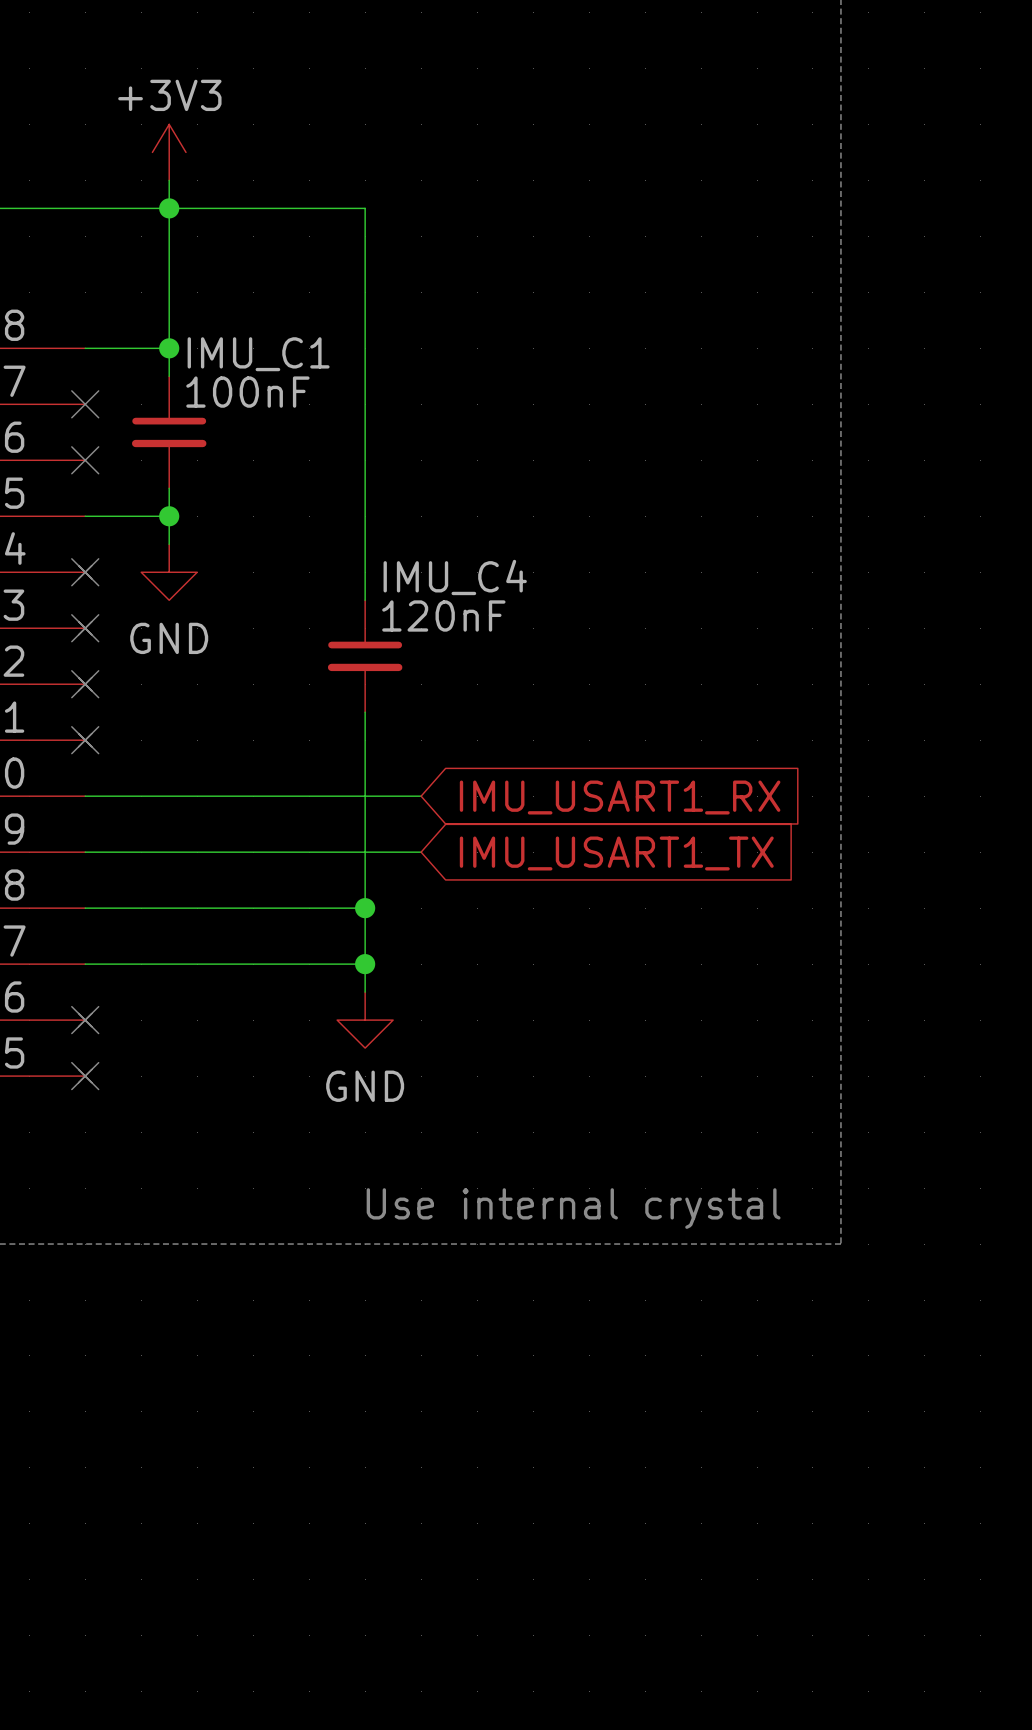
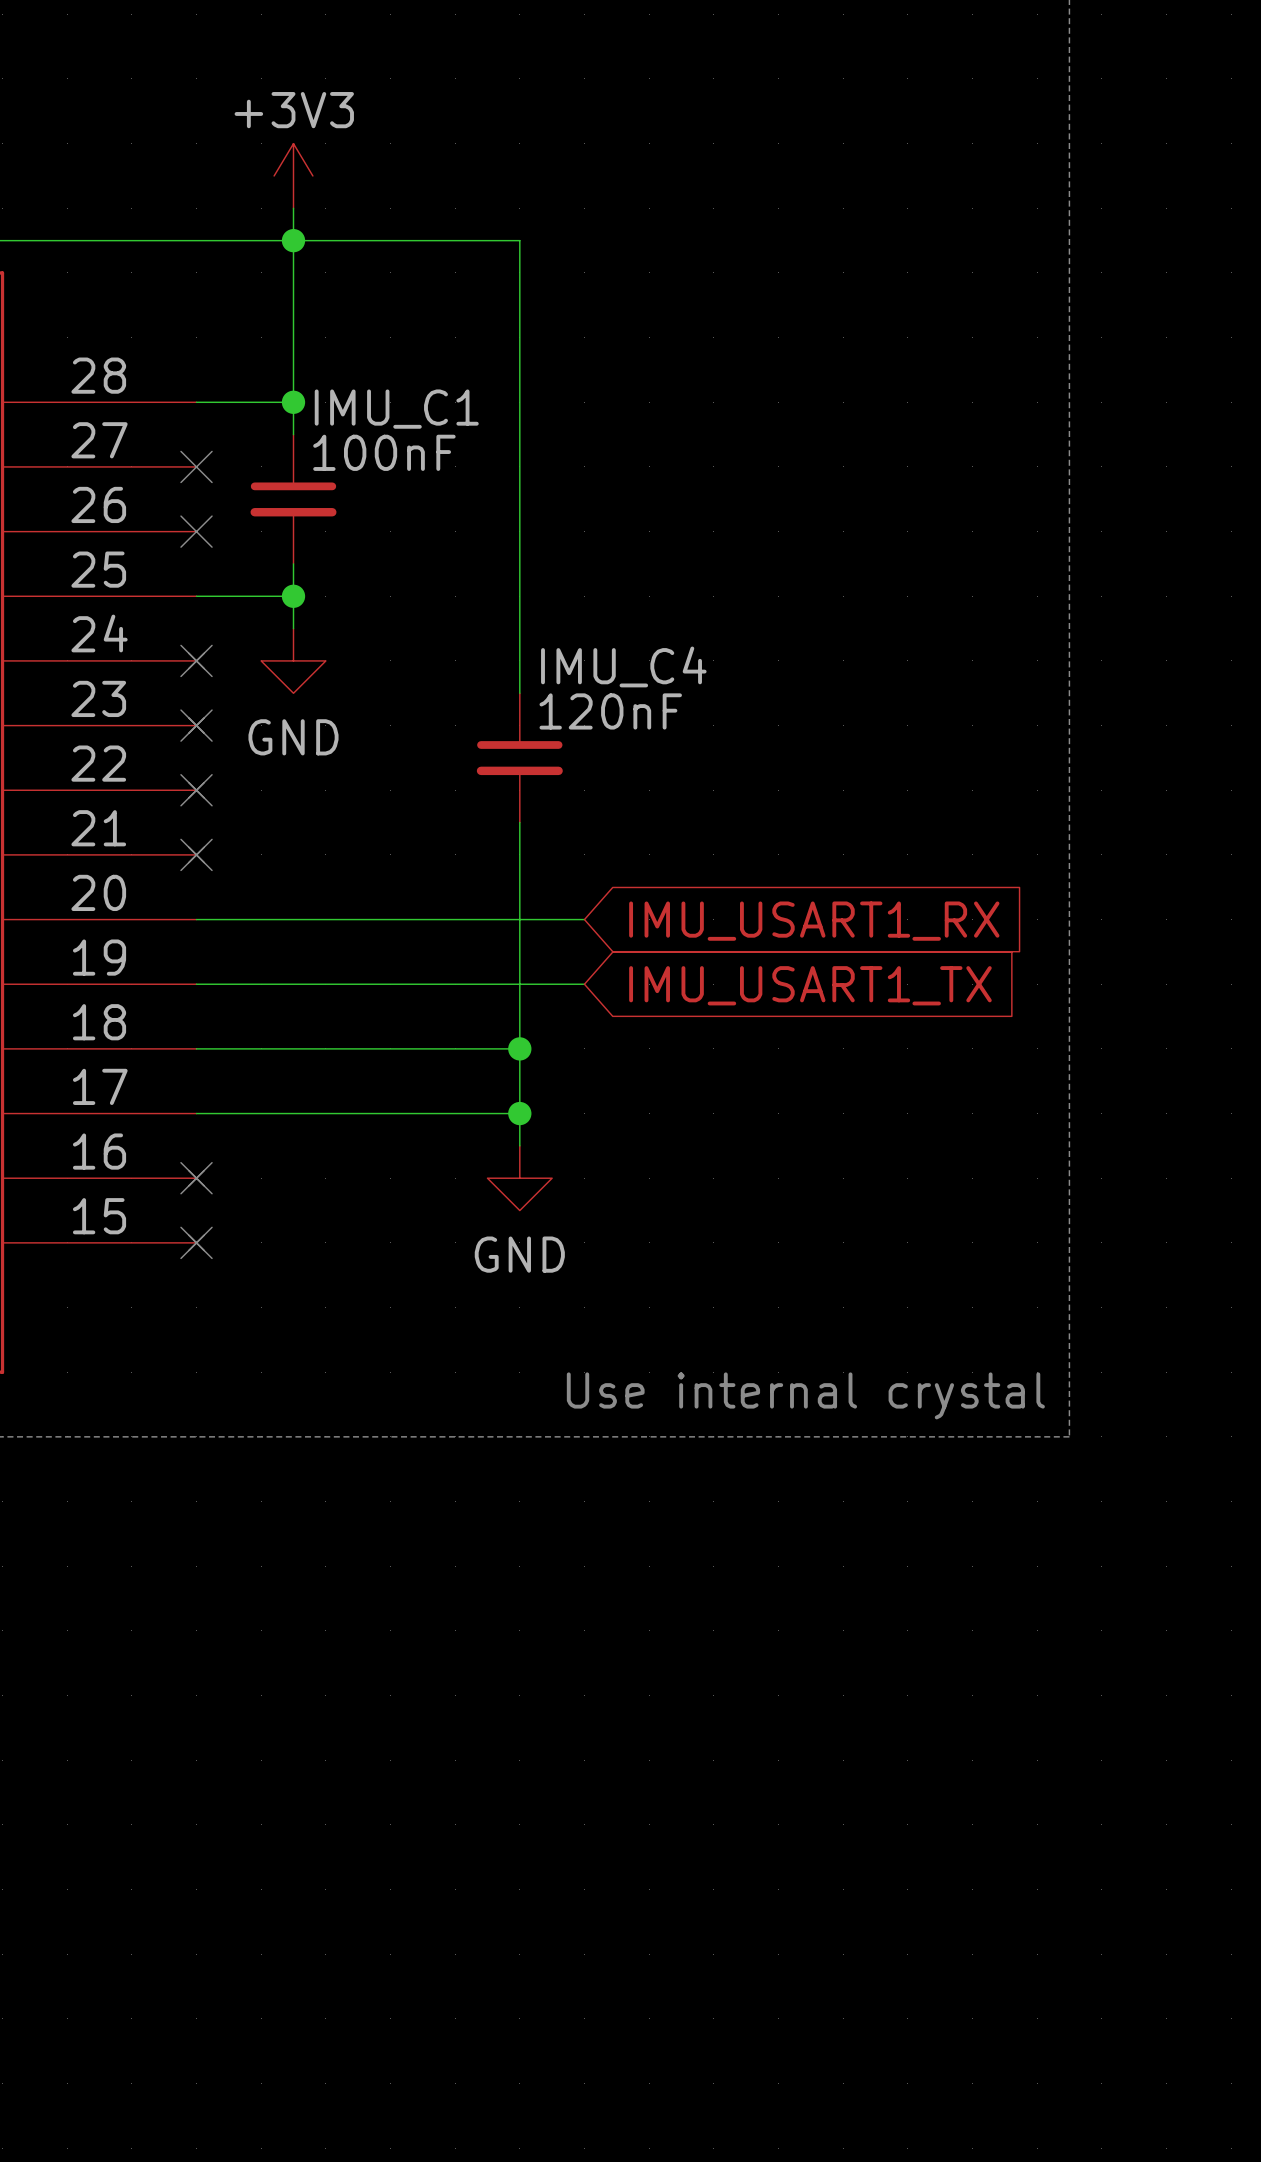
text position: Use internal crystal (573, 1208) -> Use internal crystal (805, 1395)

